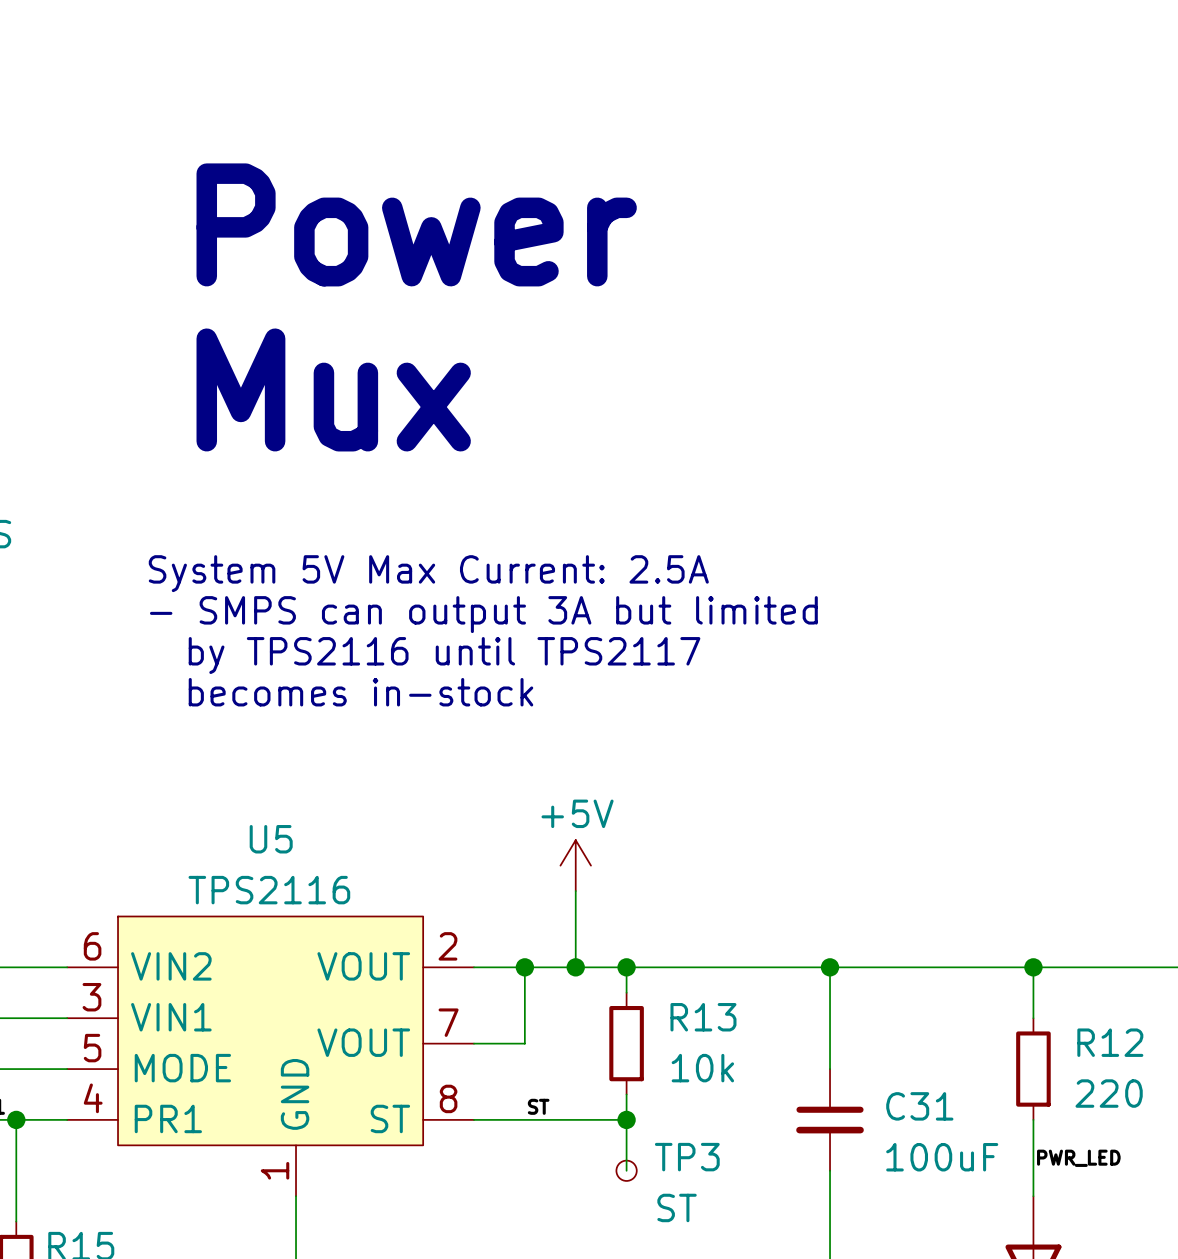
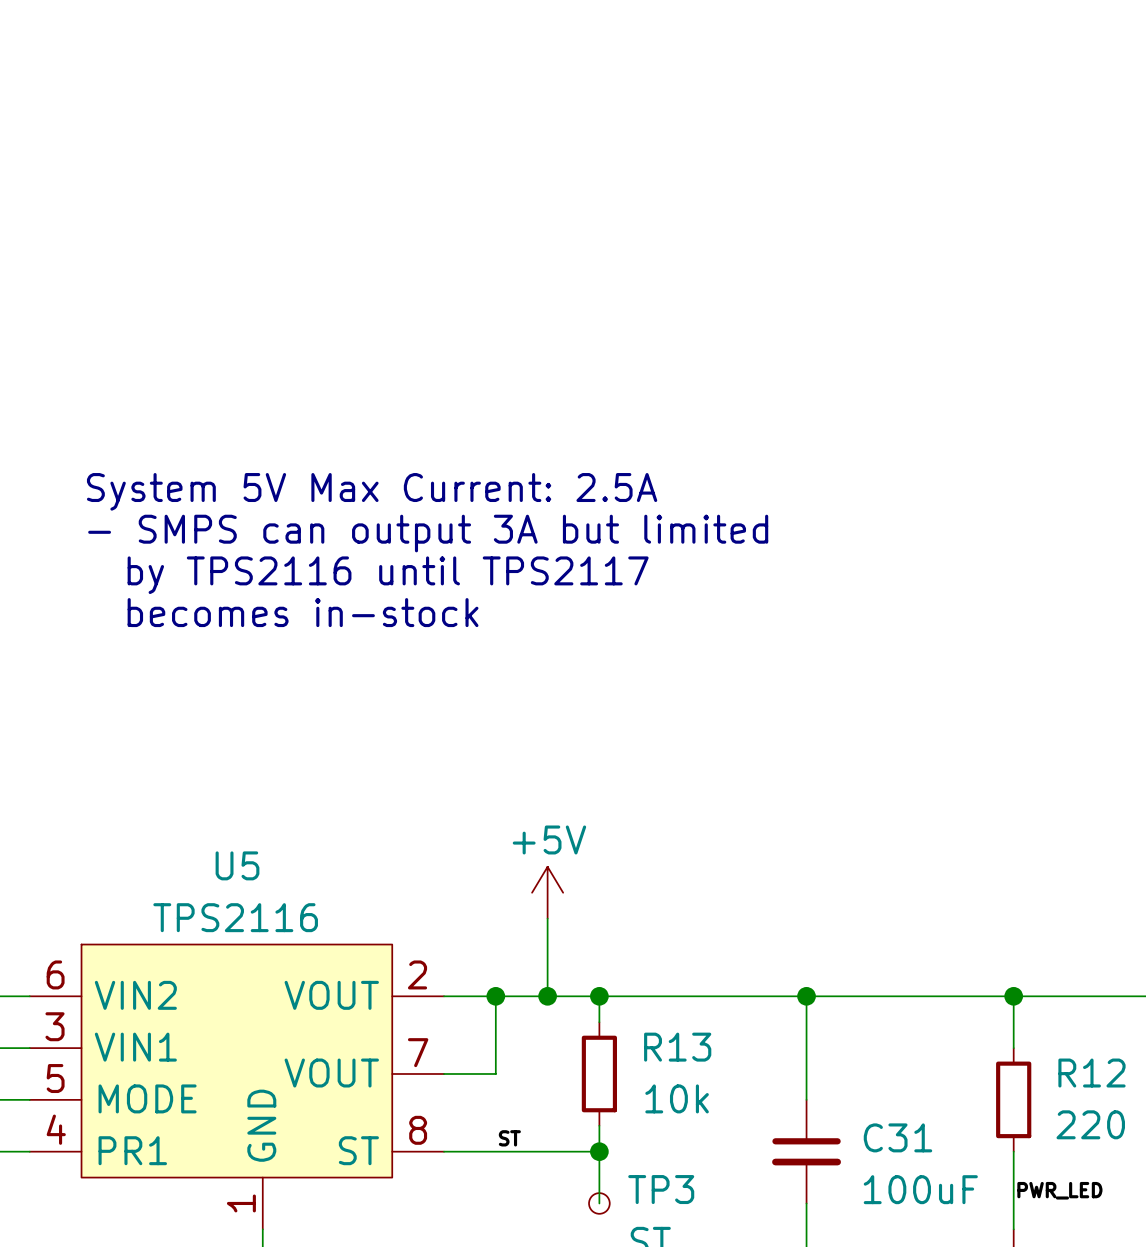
text: Power (416, 224) -> none
text: Mux (333, 389) -> none
text position: System 5V Max Current: 2.5A (428, 573) -> System 5V Max Current: 2.5A (372, 491)
text position: - SMPS can output 3A but limited (483, 614) -> - SMPS can output 3A but limited (428, 533)
text position: by TPS2116 until TPS2117 (444, 655) -> by TPS2116 until TPS2117 (388, 575)
text position: becomes in-stock (360, 692) -> becomes in-stock (303, 612)

